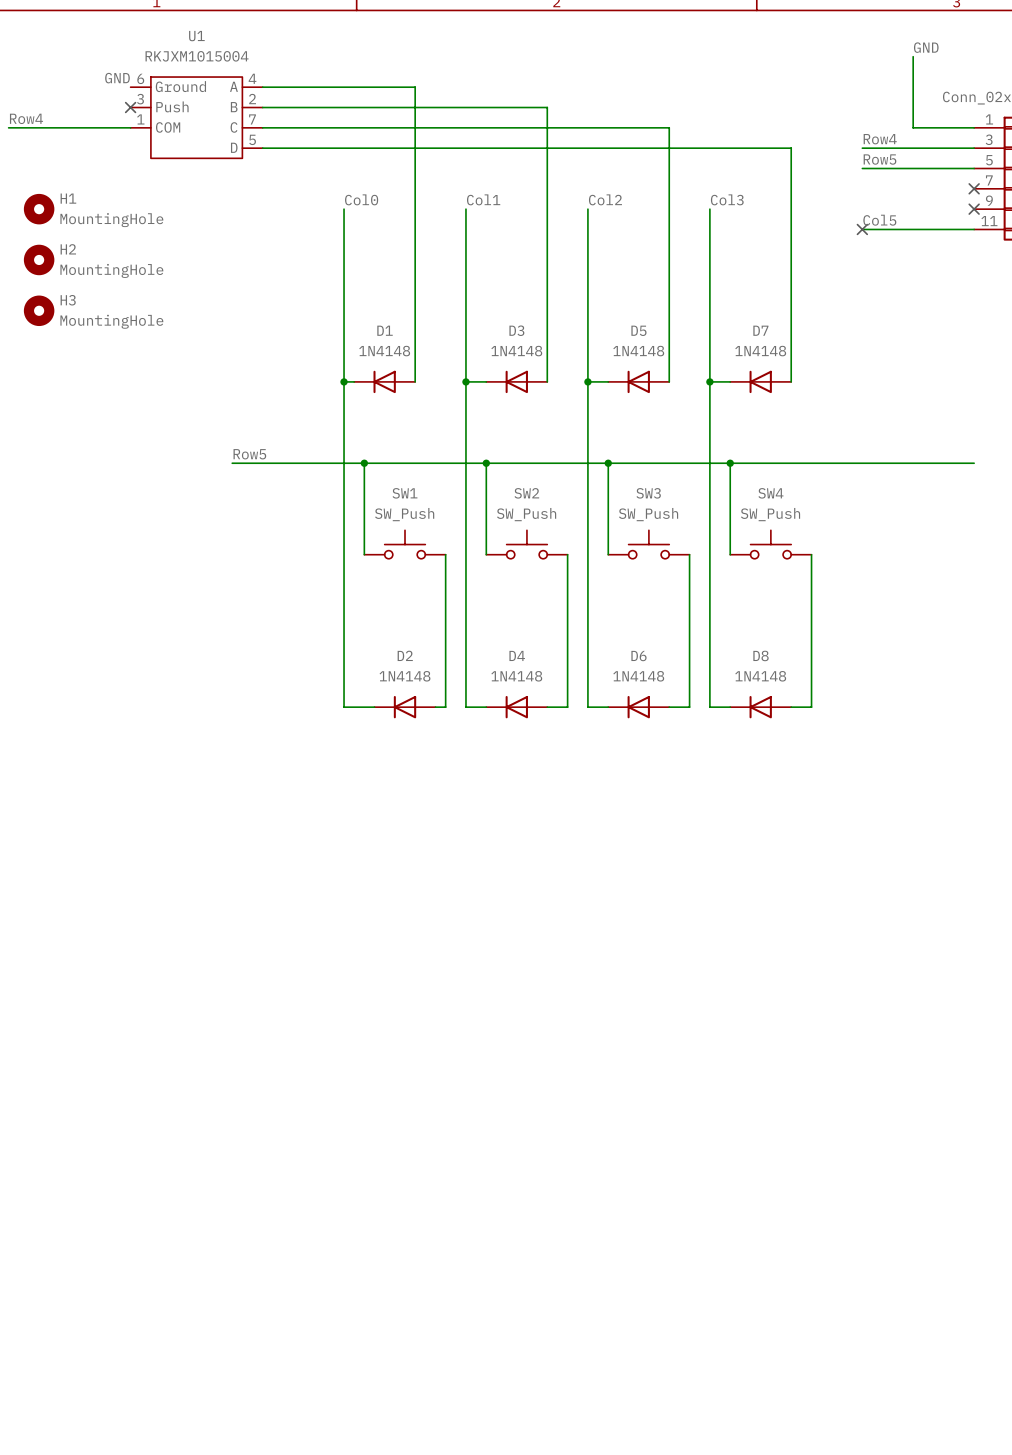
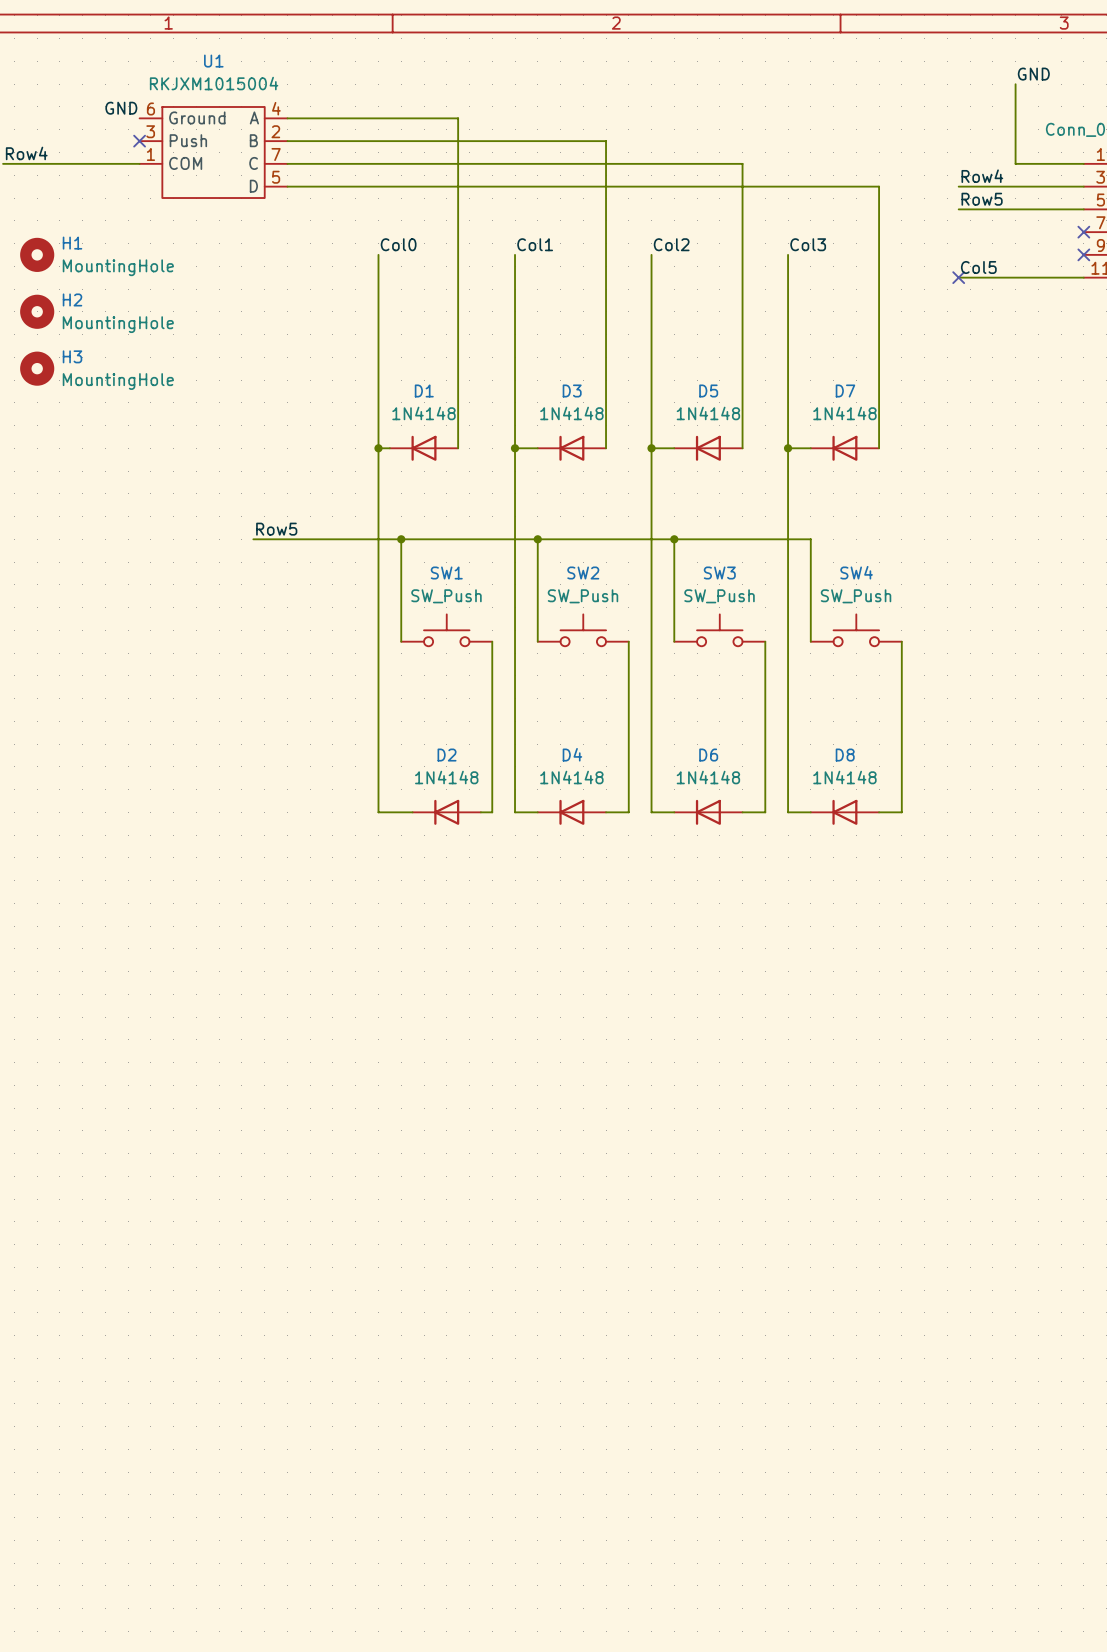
wire: (730, 463) (974, 463) -> none
junction: (730, 463) -> none

